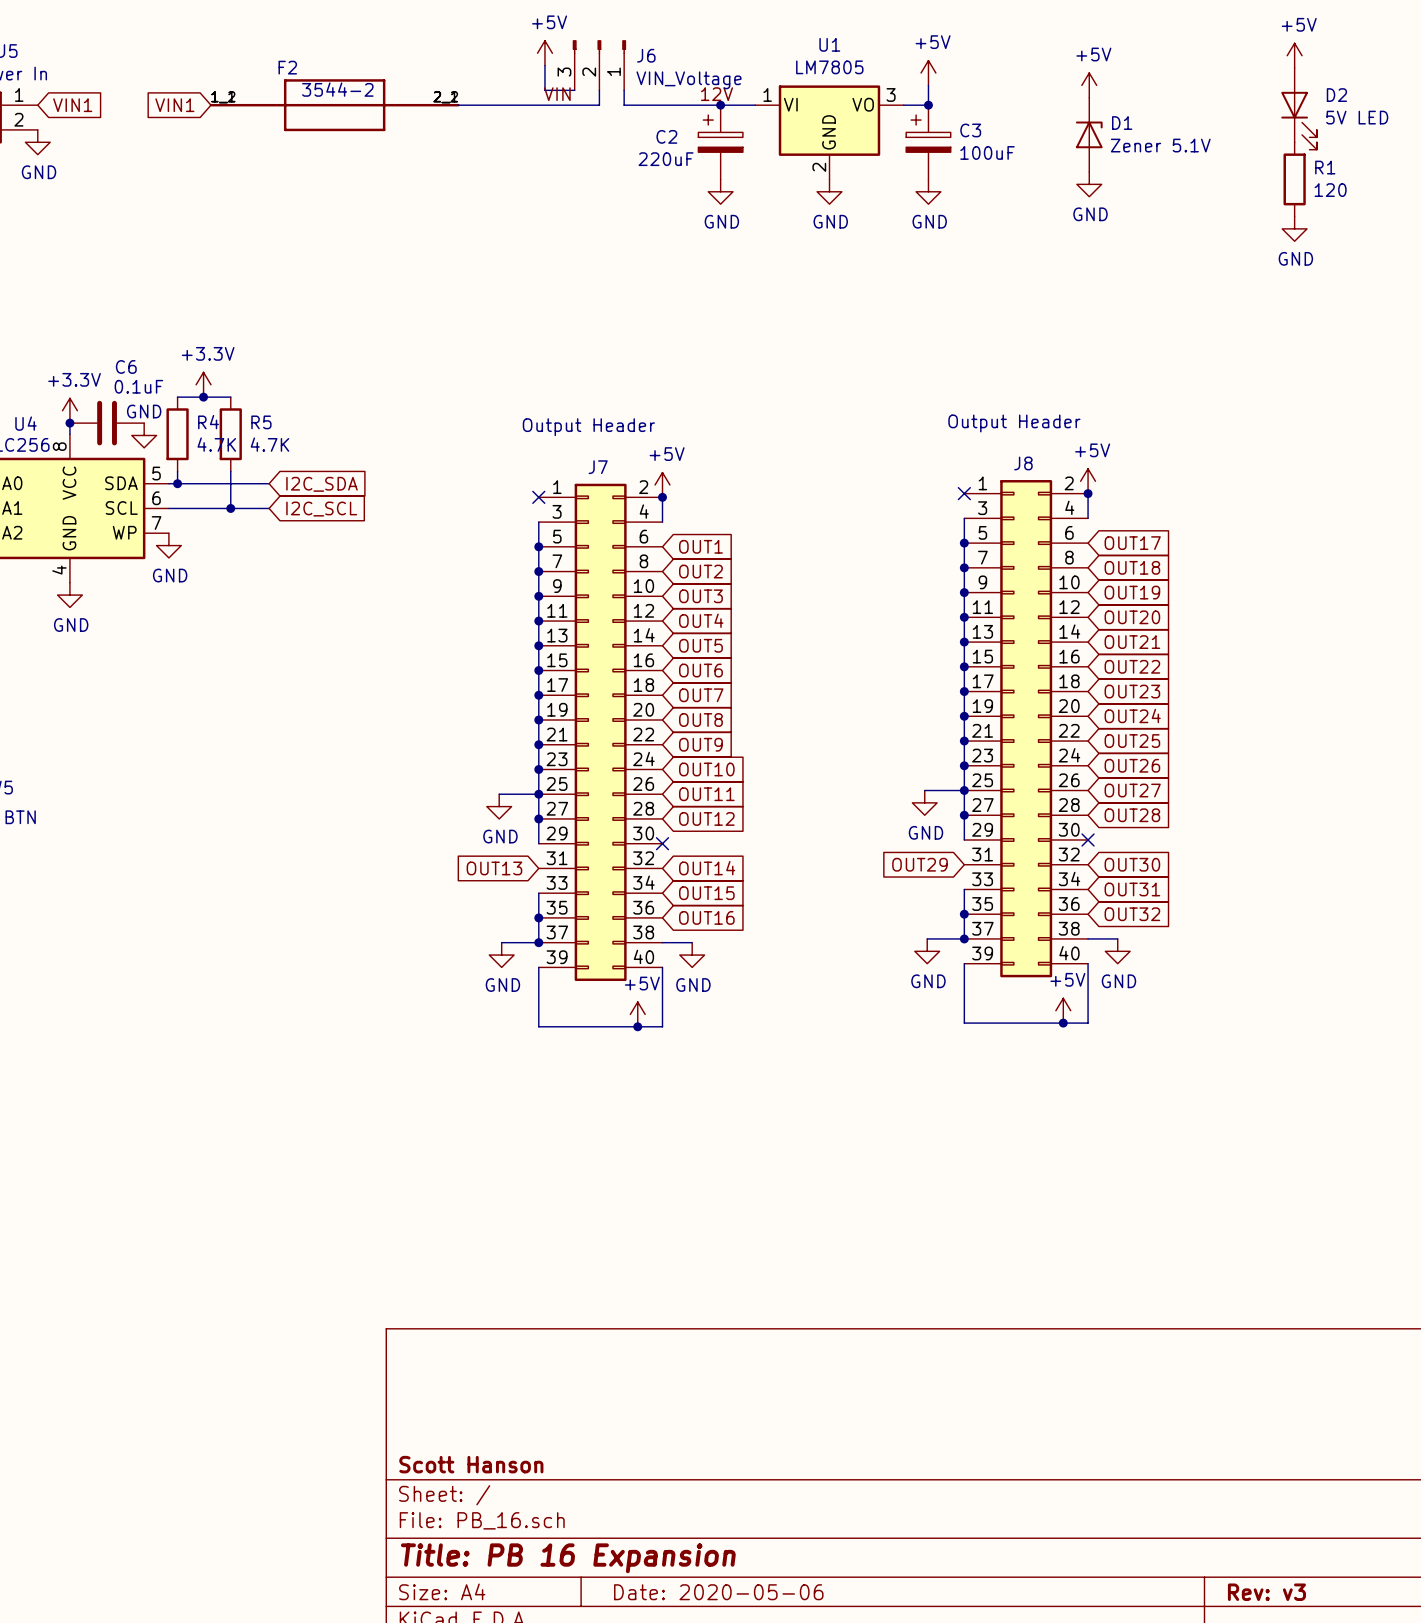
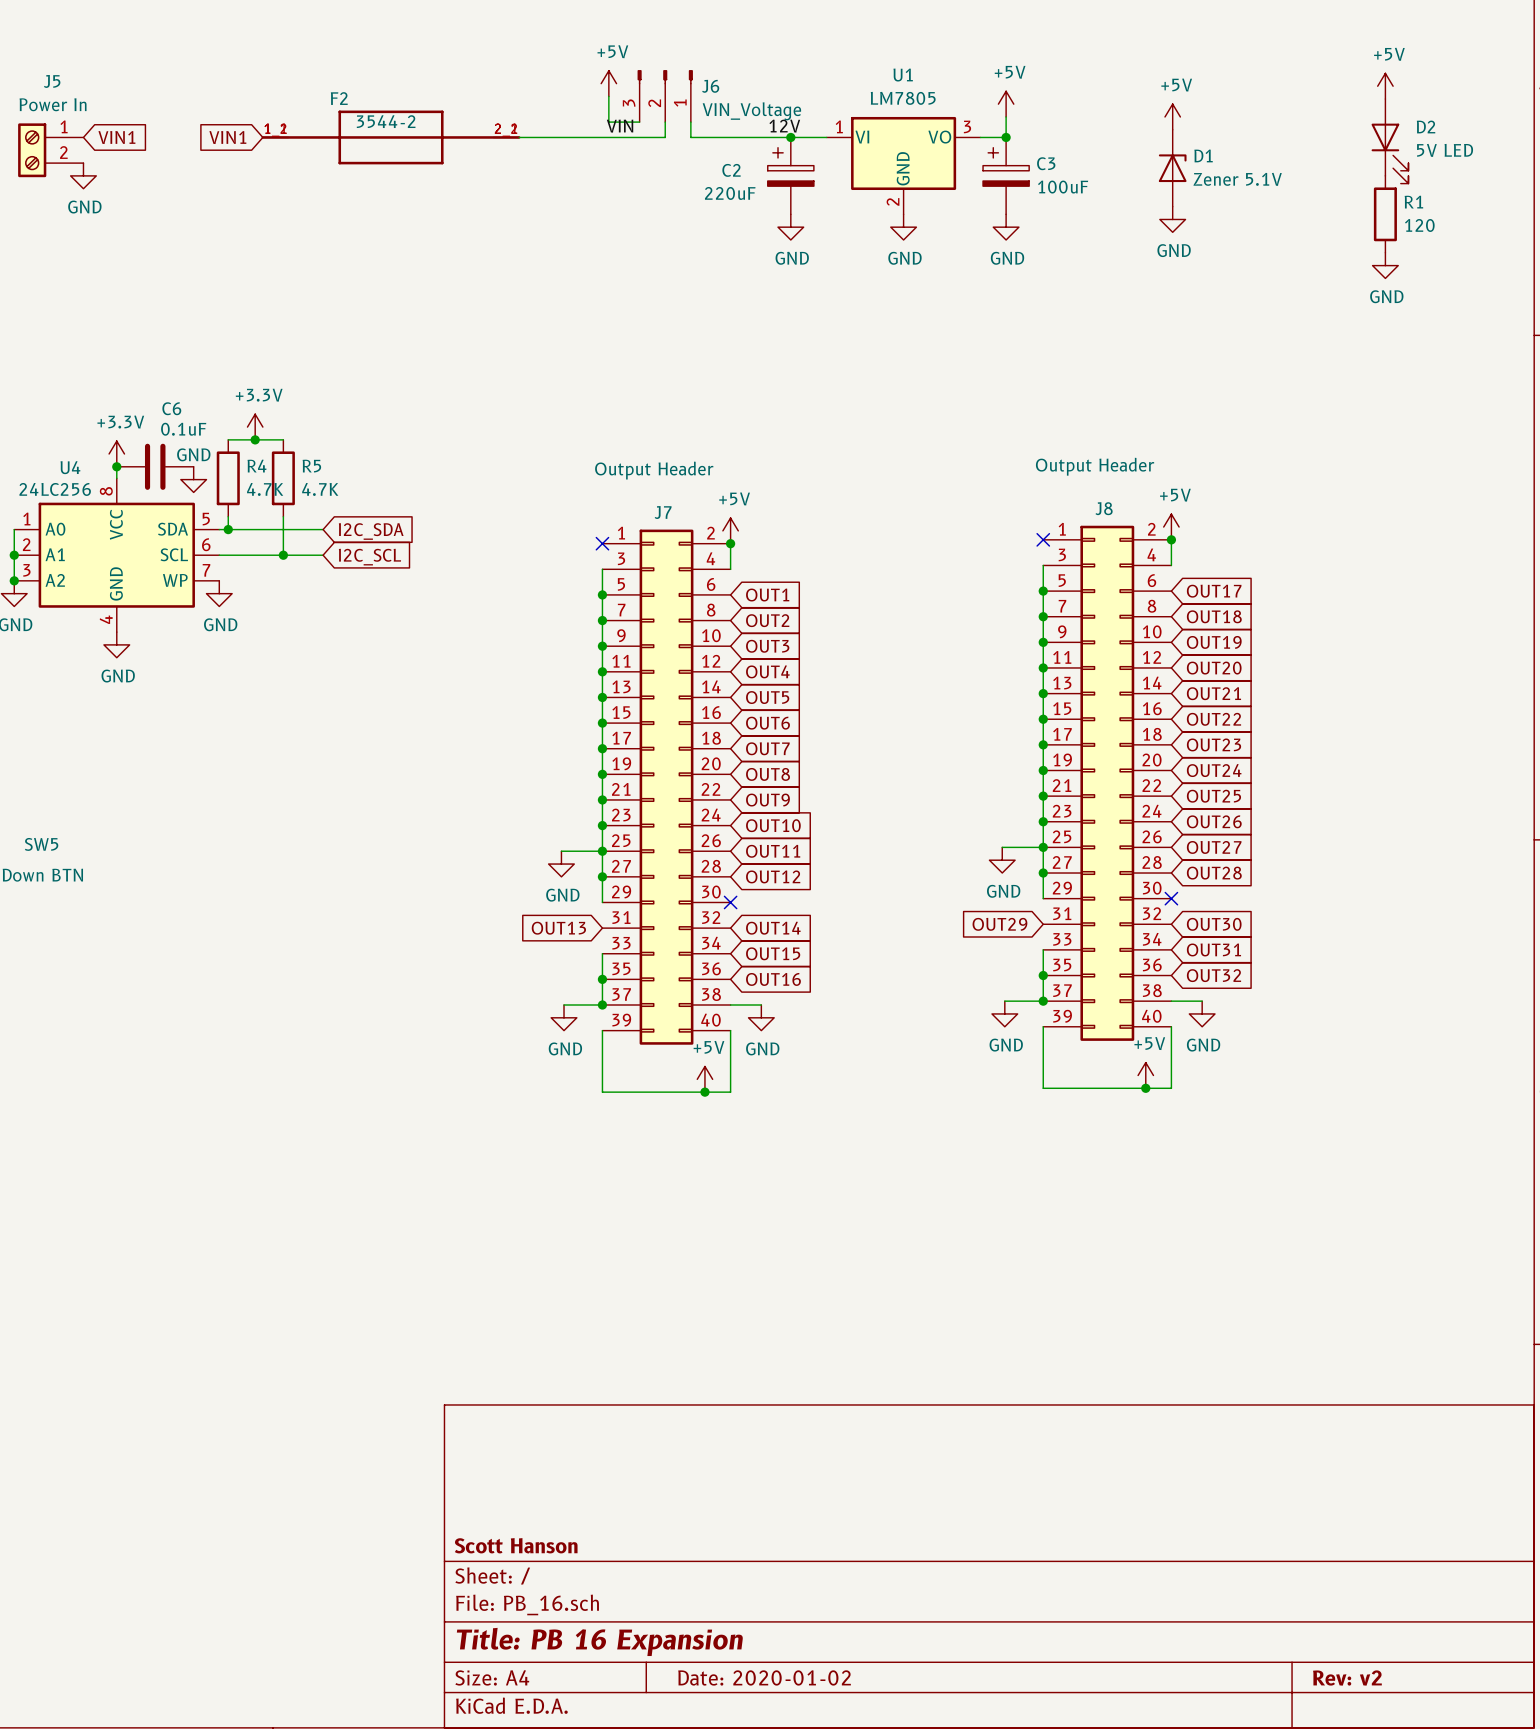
title block: Date: 2020-05-06 (718, 1592) -> Date: 2020-01-02 (764, 1677)
title block: Rev: v3 (1266, 1592) -> Rev: v2 (1347, 1678)

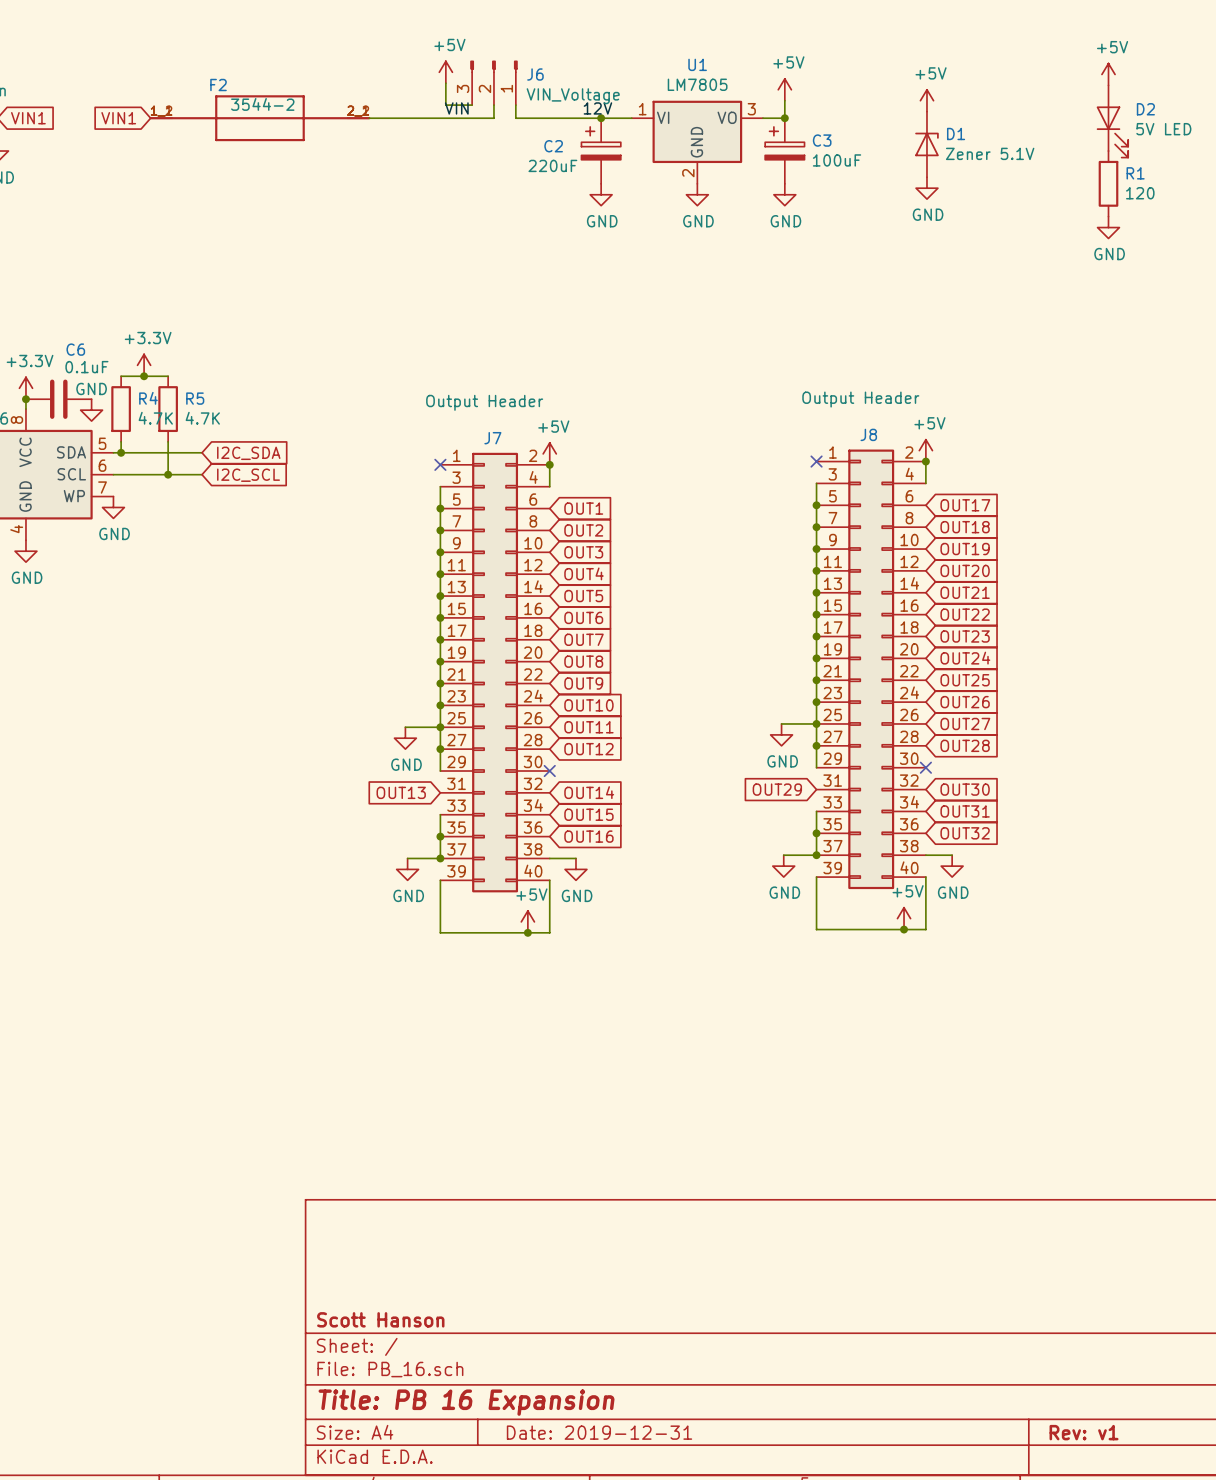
title block: Date: 2020-01-02 (764, 1677) -> Date: 2019-12-31 (599, 1432)
title block: Rev: v2 (1347, 1678) -> Rev: v1 (1084, 1432)

